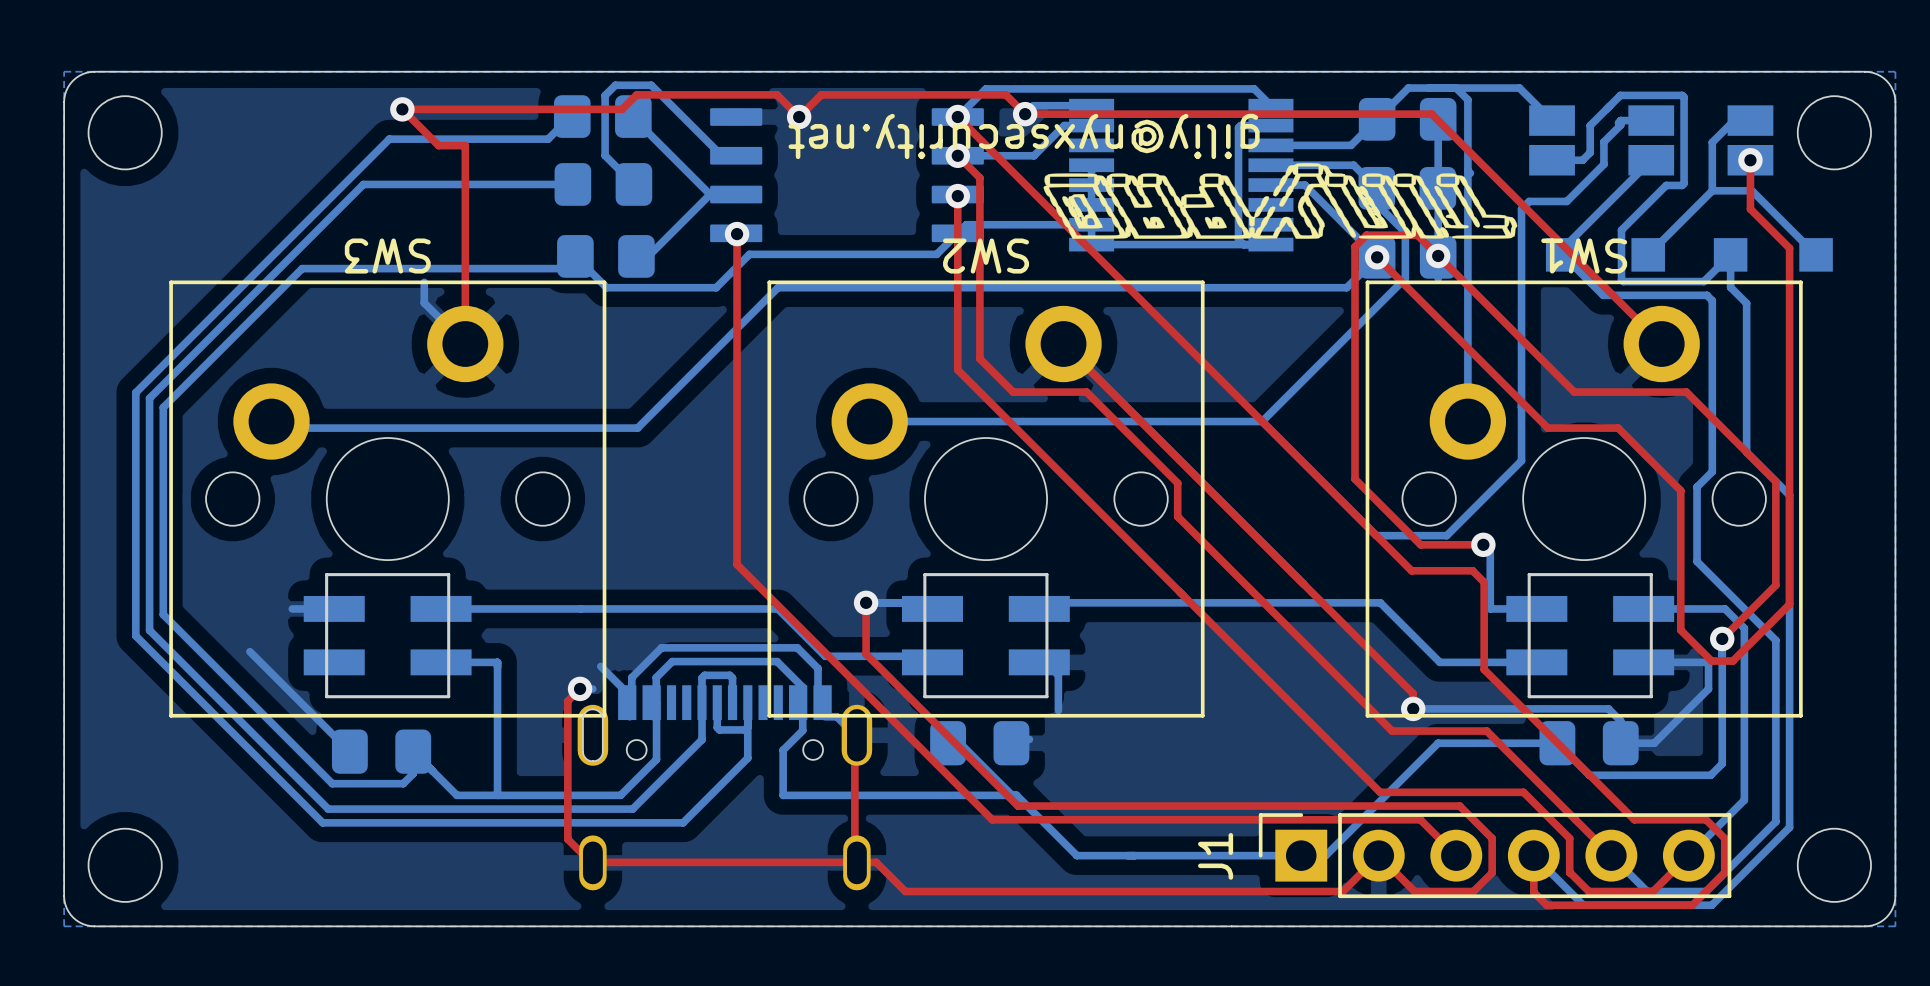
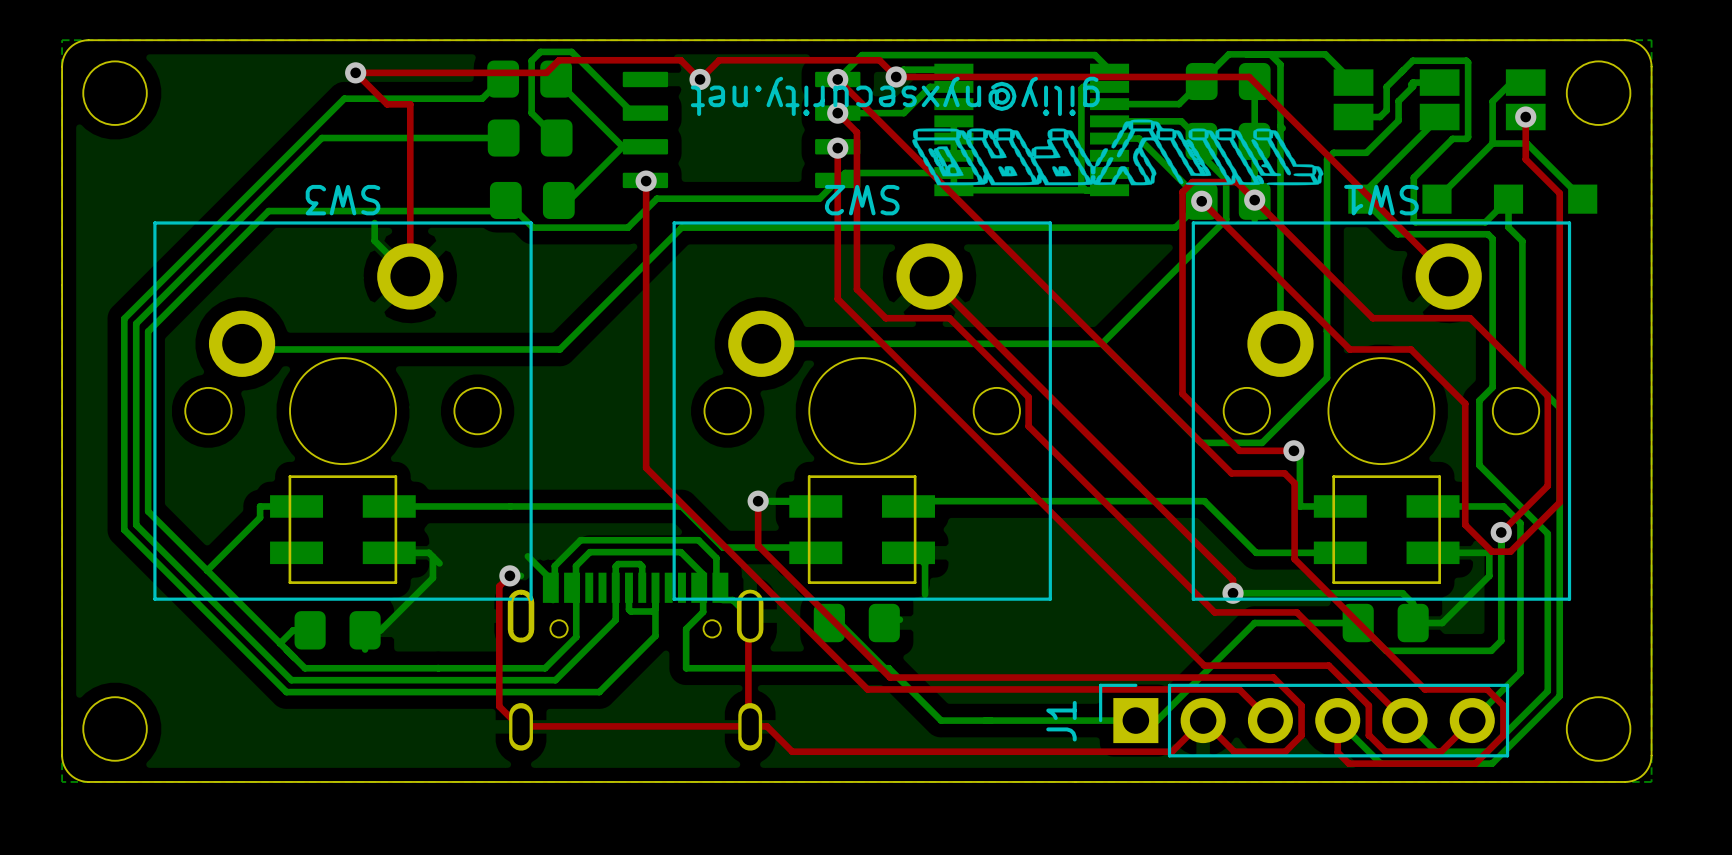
bottom track: none -> (260, 506) (260, 517) (207, 570)
bottom track: (249, 651) (349, 751) -> (280, 643) (293, 630) (310, 630)
bottom track: (486, 662) (497, 662) (497, 795) -> (428, 552) (439, 563)
bottom track: (413, 751) (456, 795) -> (365, 630) (380, 630) (432, 578) (432, 556)
bottom track: (413, 773) (403, 783) (332, 783) -> (403, 668) (304, 668) (294, 658)

